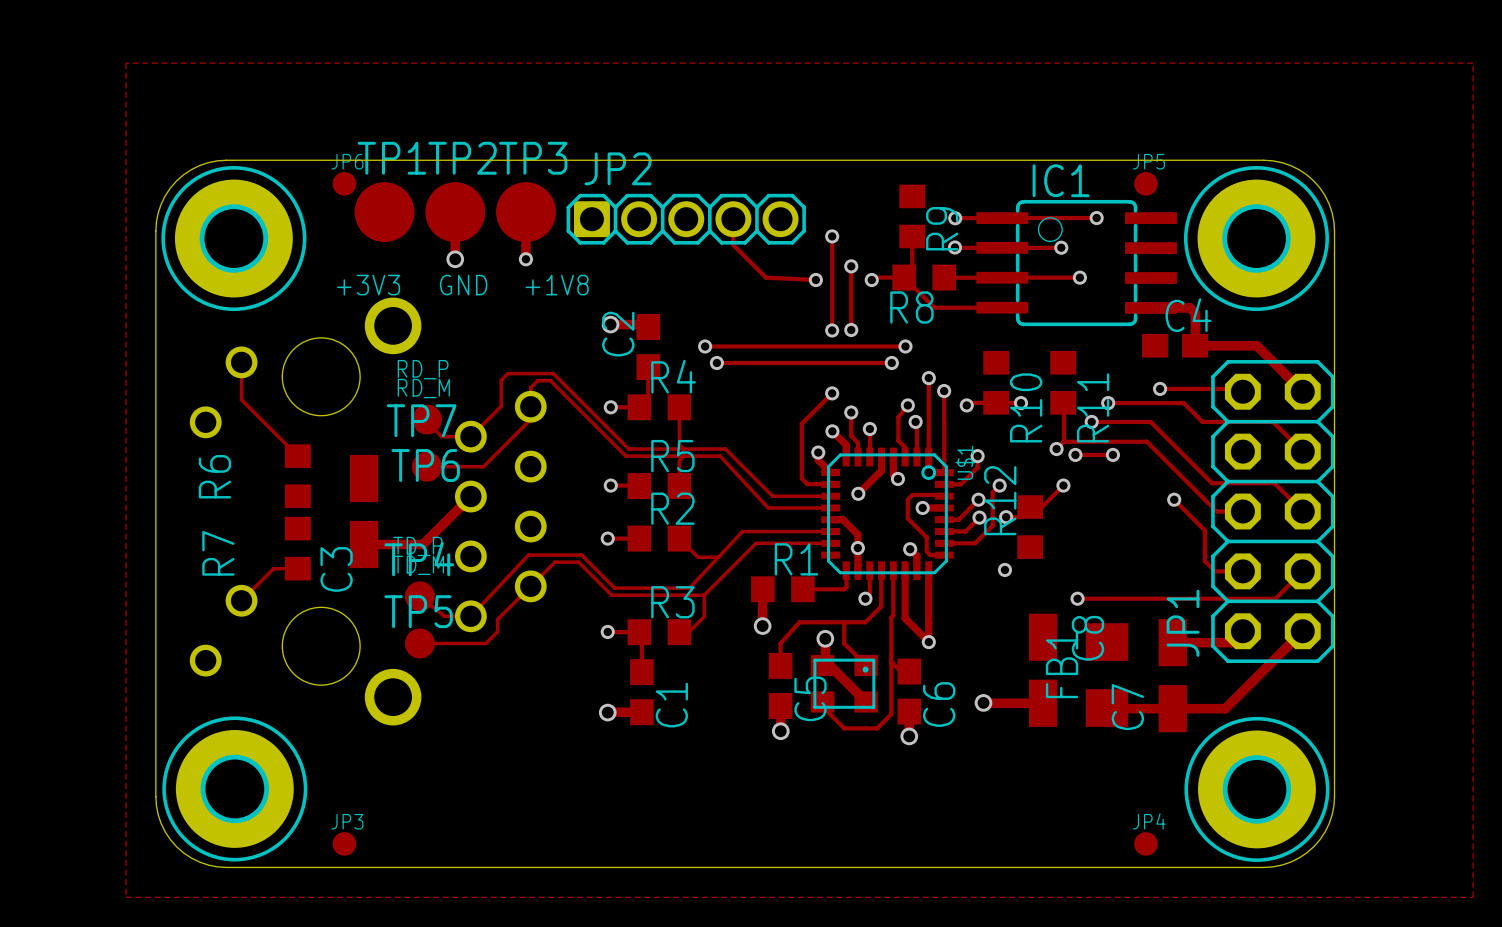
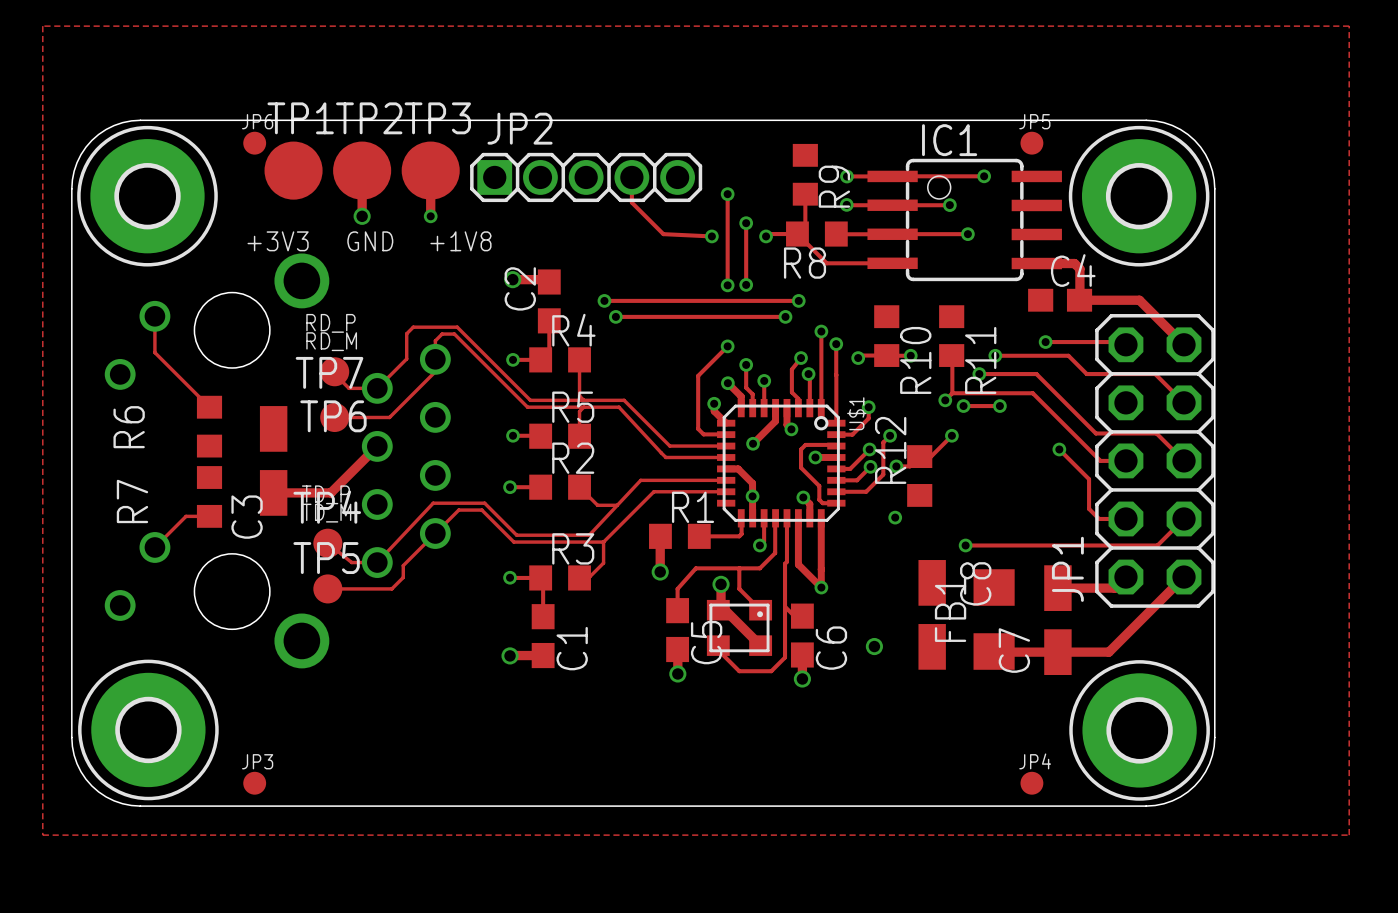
track: (983, 703) (1043, 703) -> none

